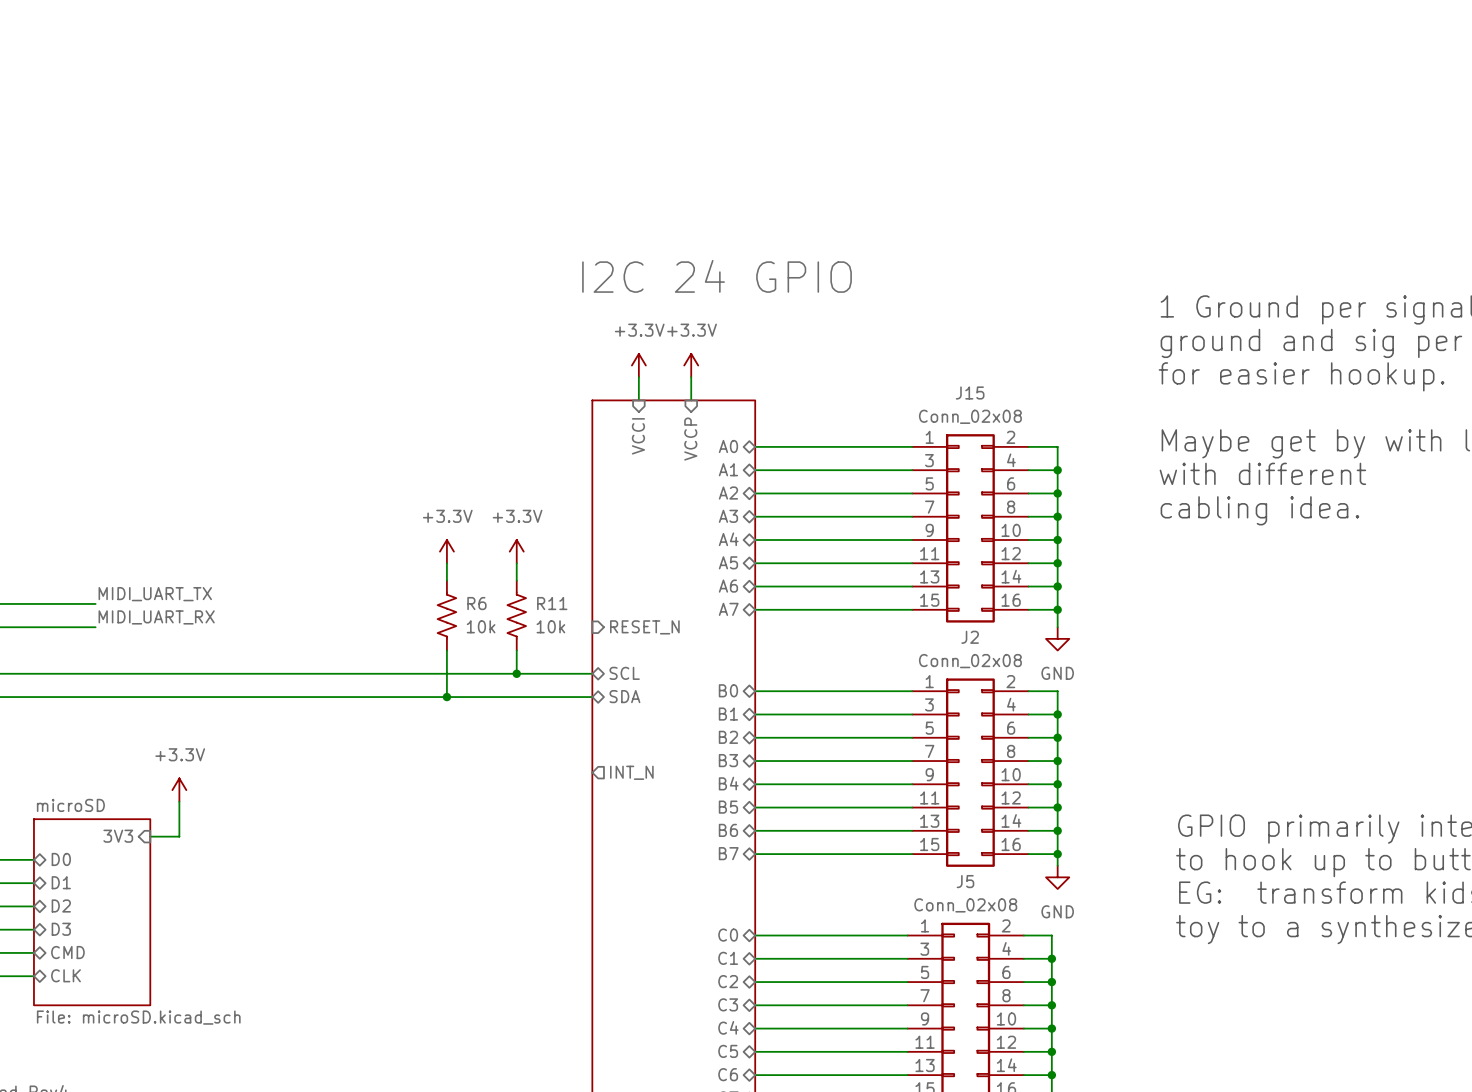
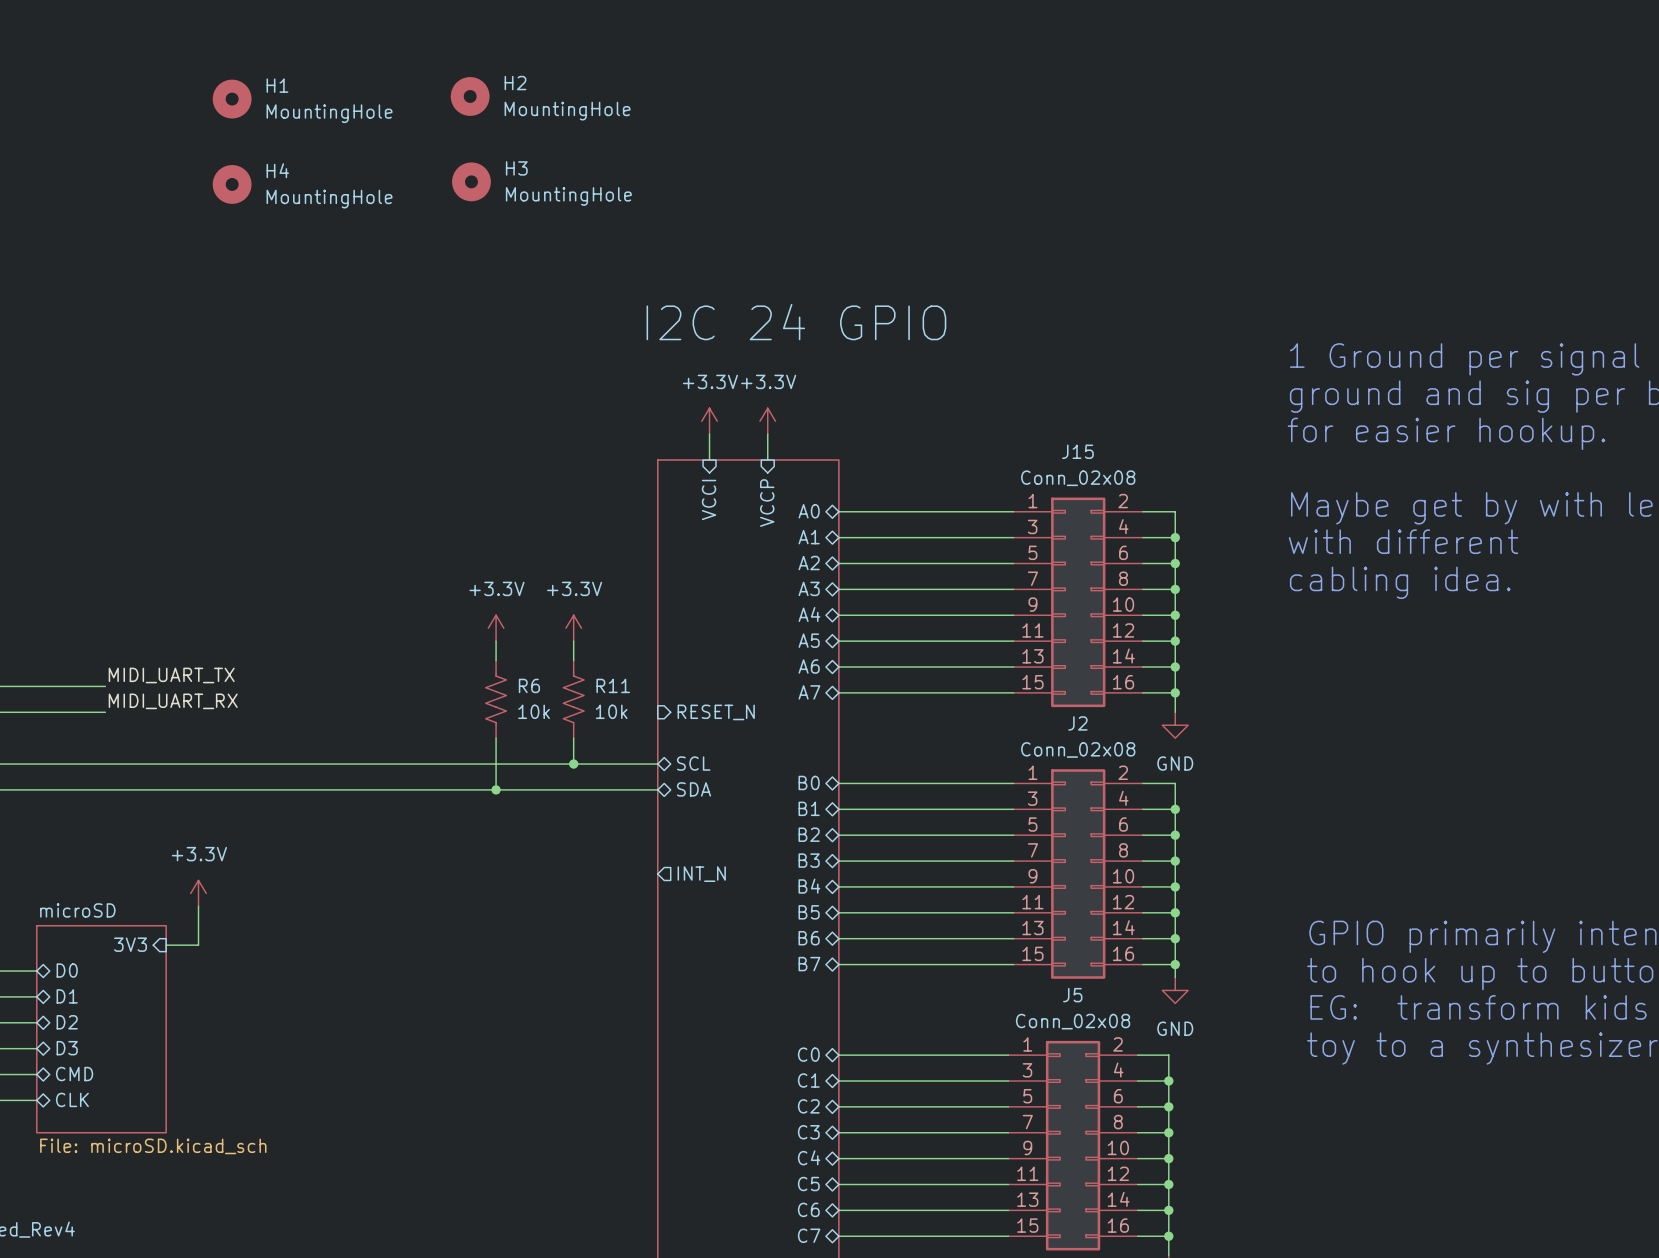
H2: none -> MountingHole (470, 96)
H1: none -> MountingHole (232, 99)
H3: none -> MountingHole (471, 181)
H4: none -> MountingHole (232, 184)

